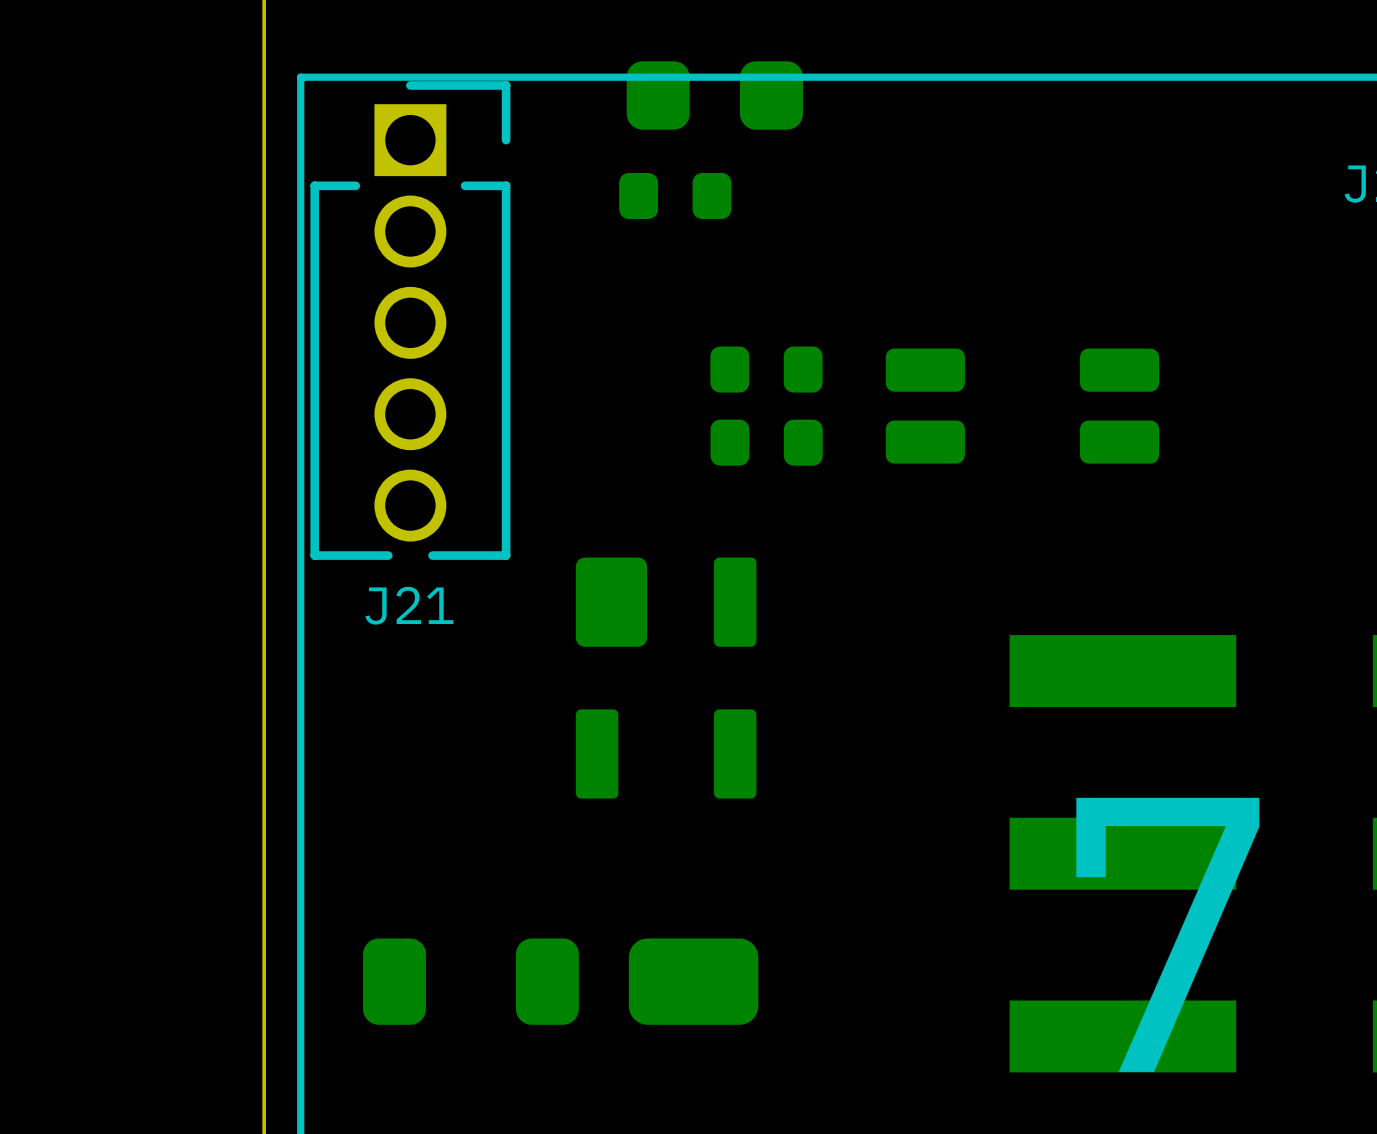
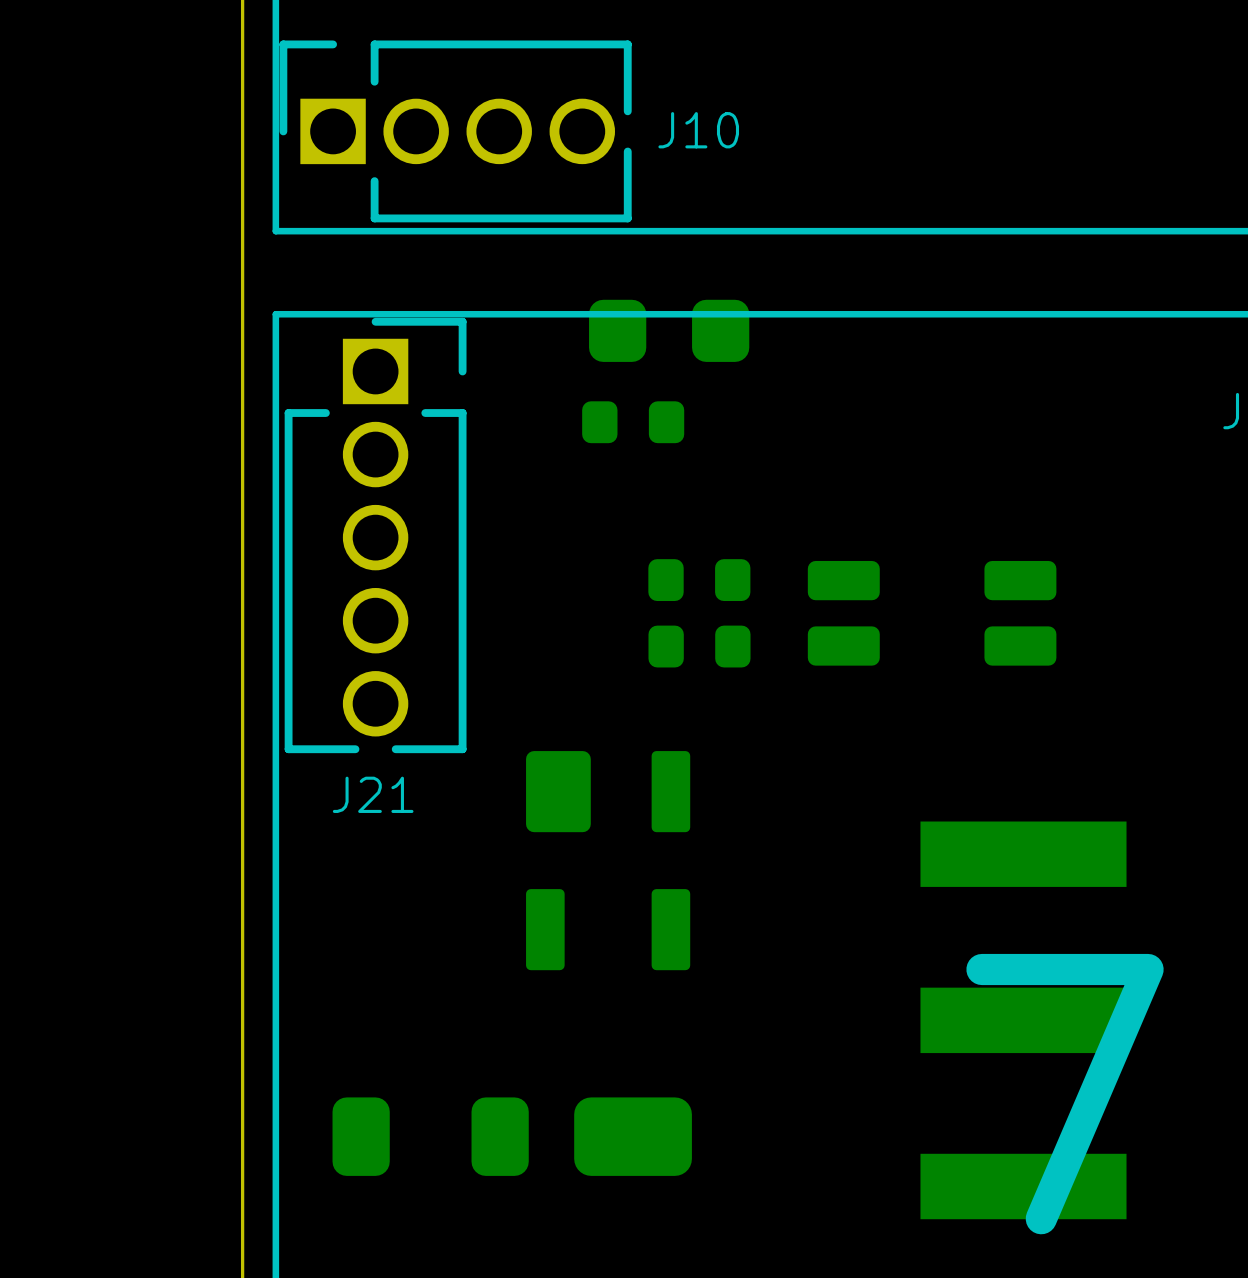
part position: (714, 95) -> (669, 330)
part position: (675, 195) -> (633, 422)

